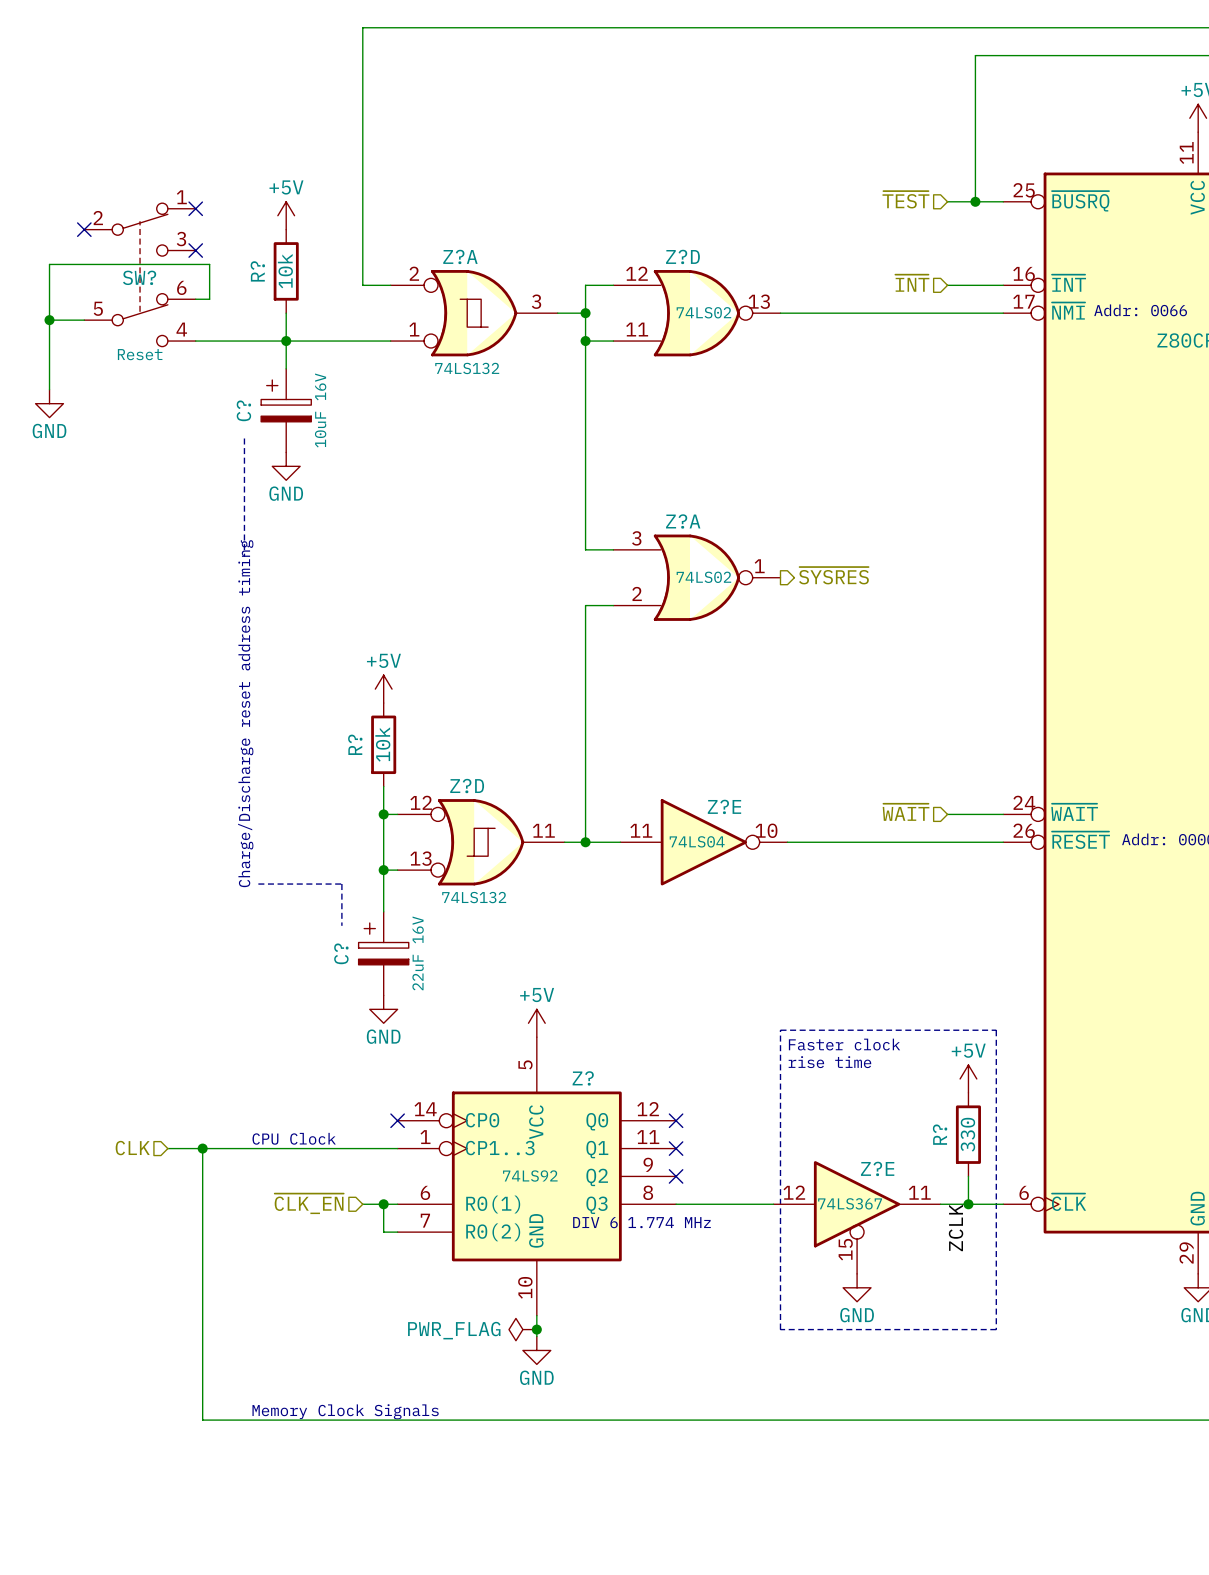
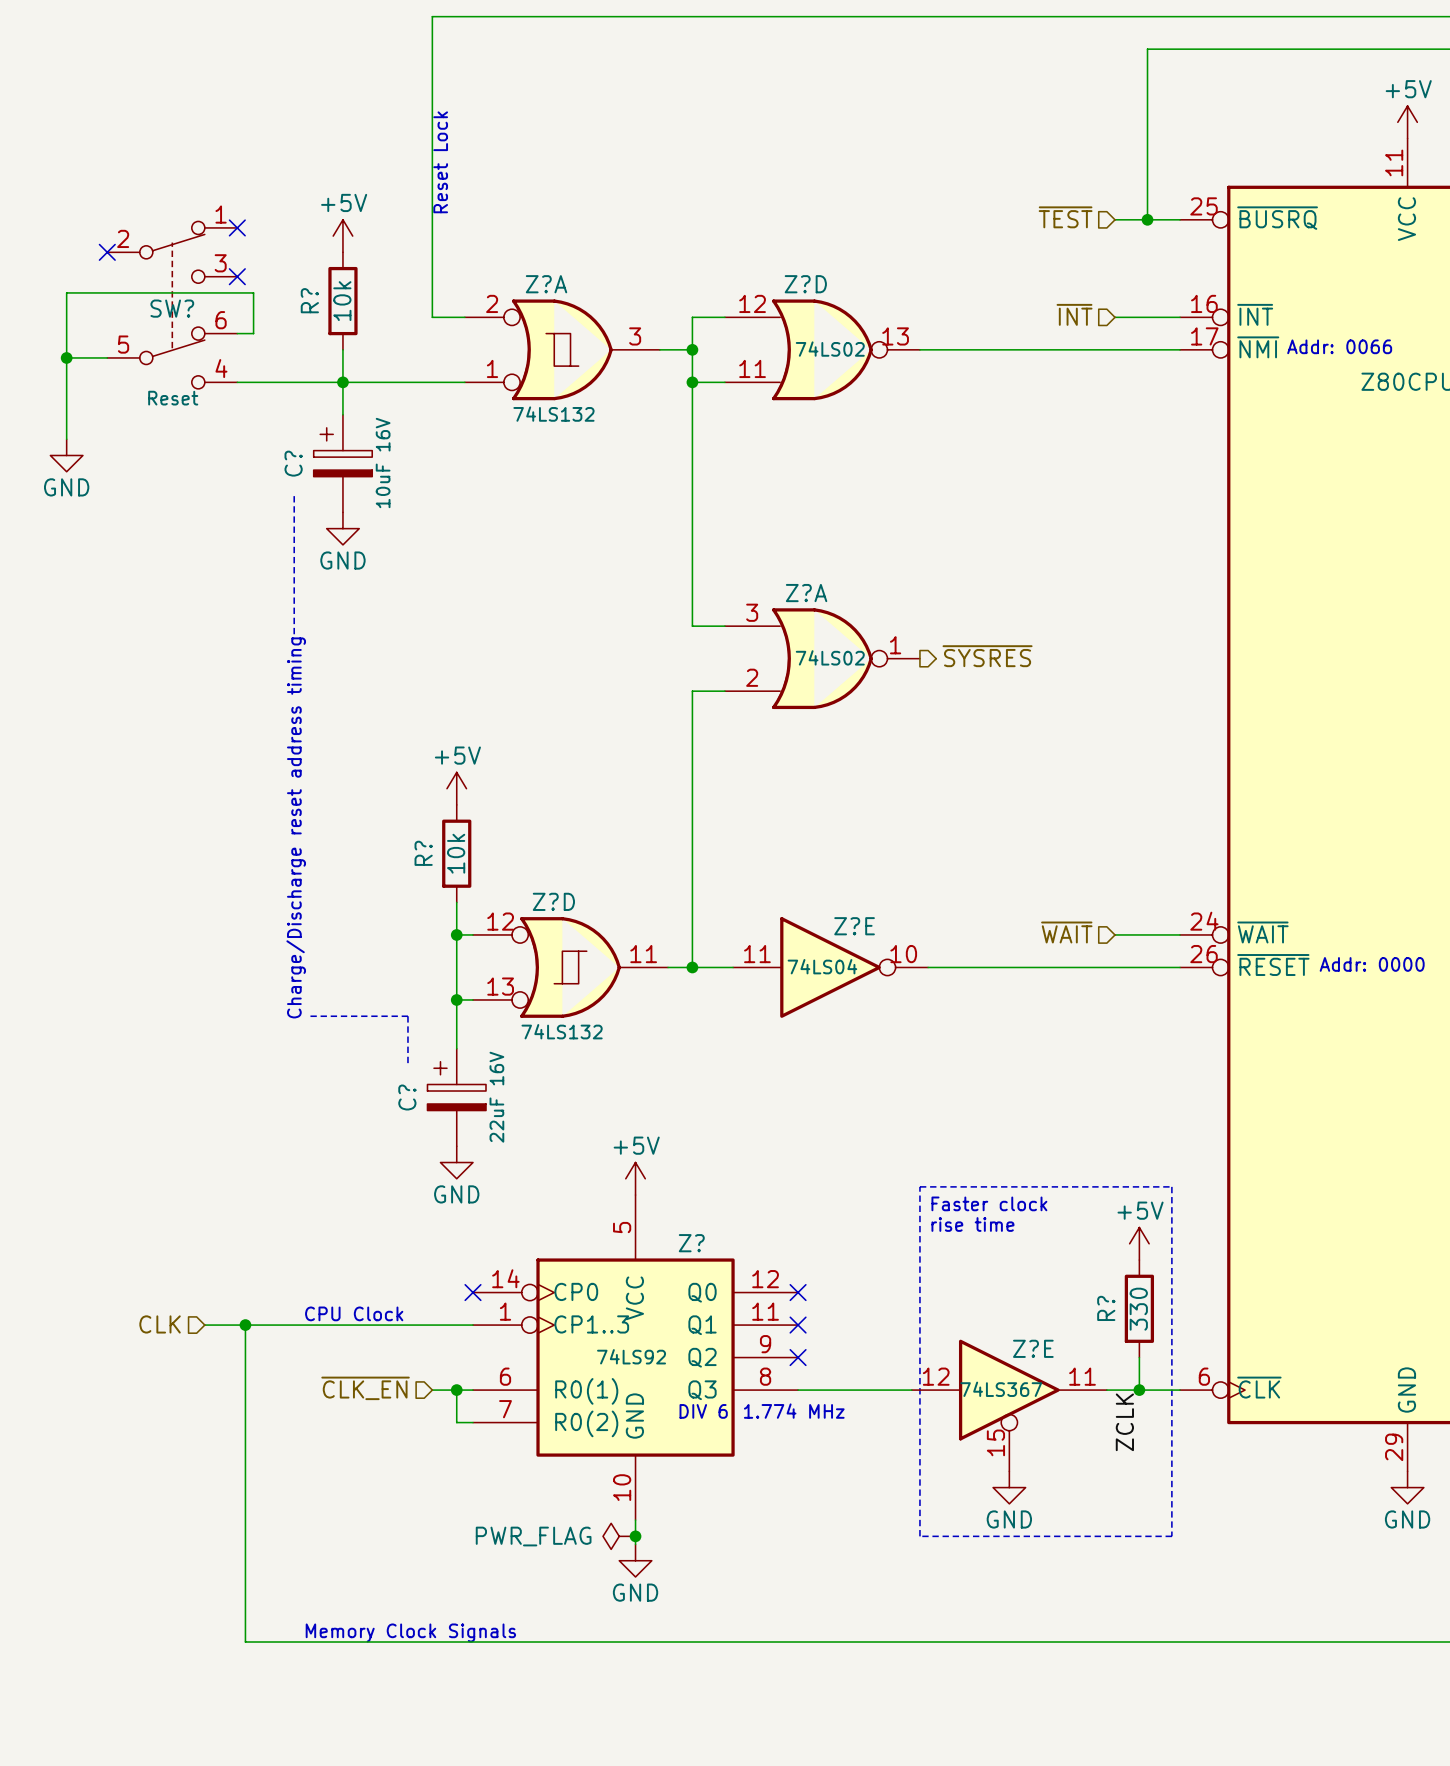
text: none -> Reset Lock (440, 162)

